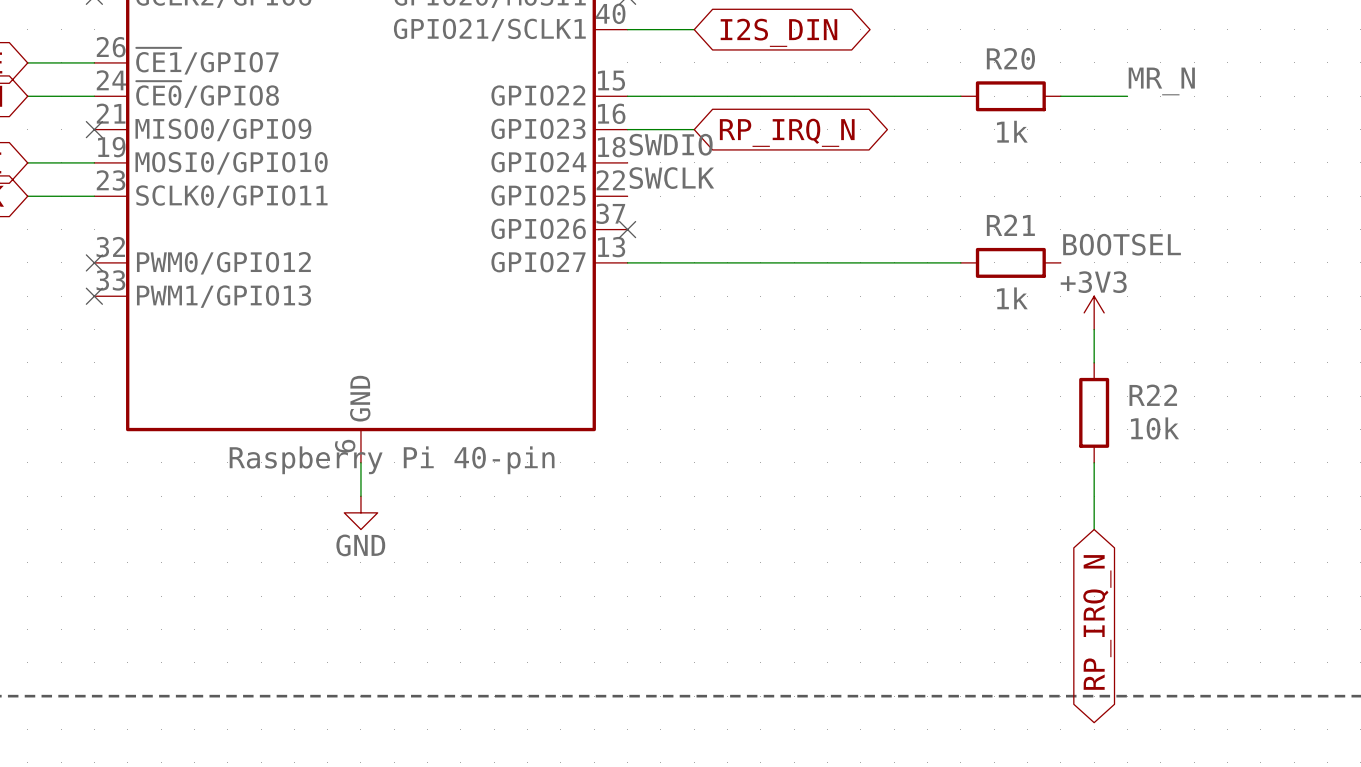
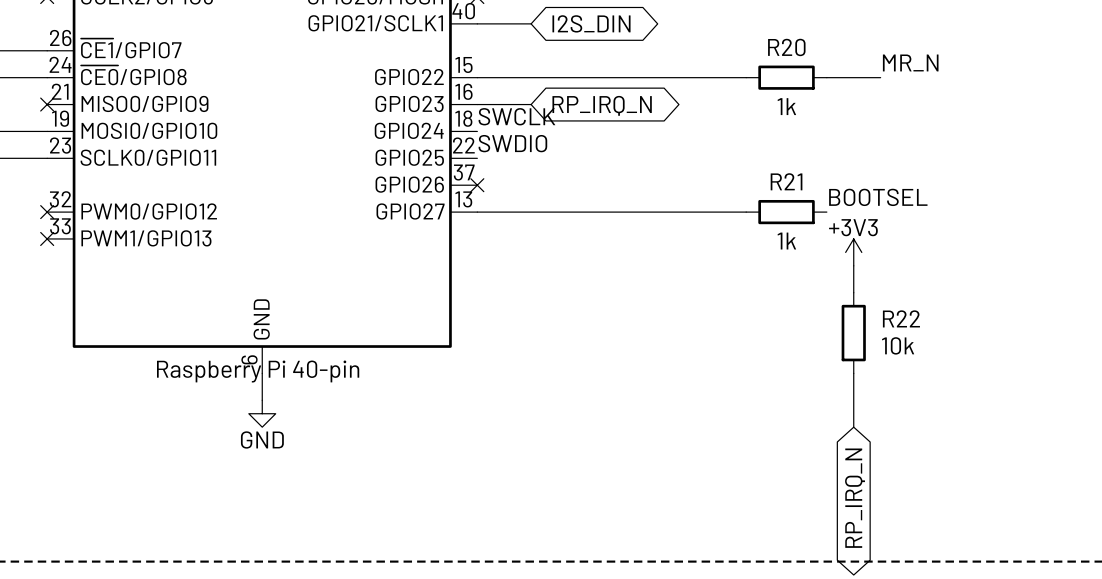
label: SWDIO (671, 144) -> SWCLK (516, 116)
label: SWCLK (671, 178) -> SWDIO (512, 143)

